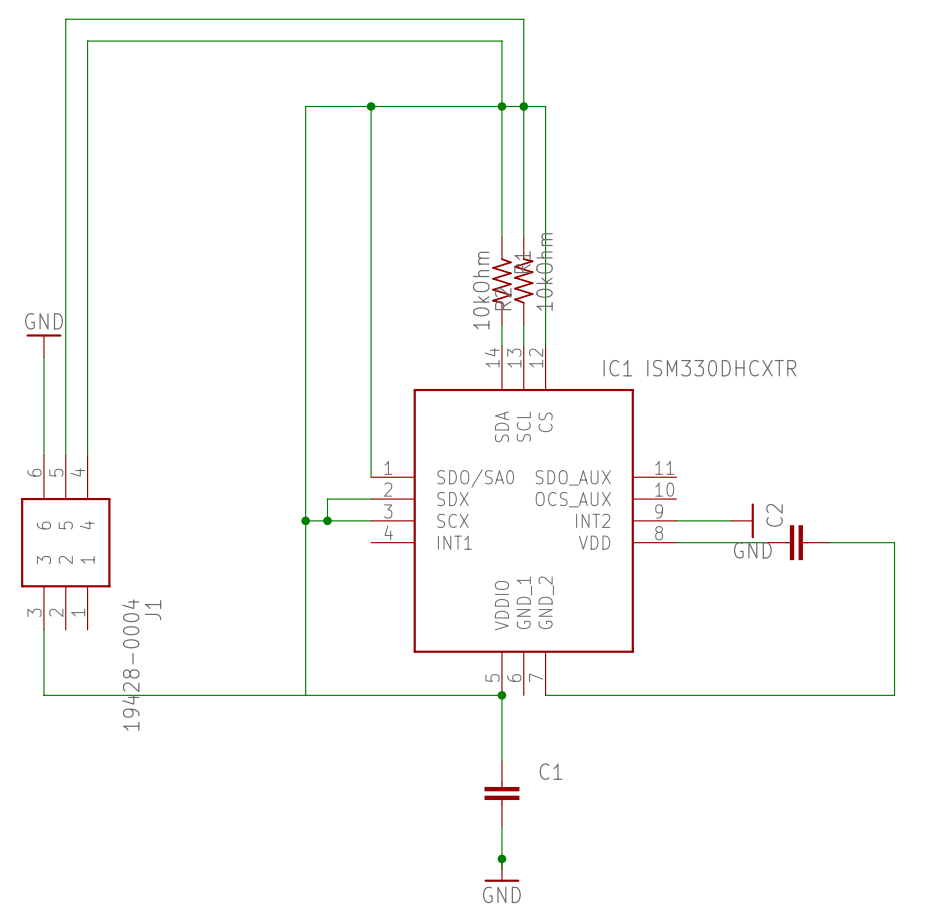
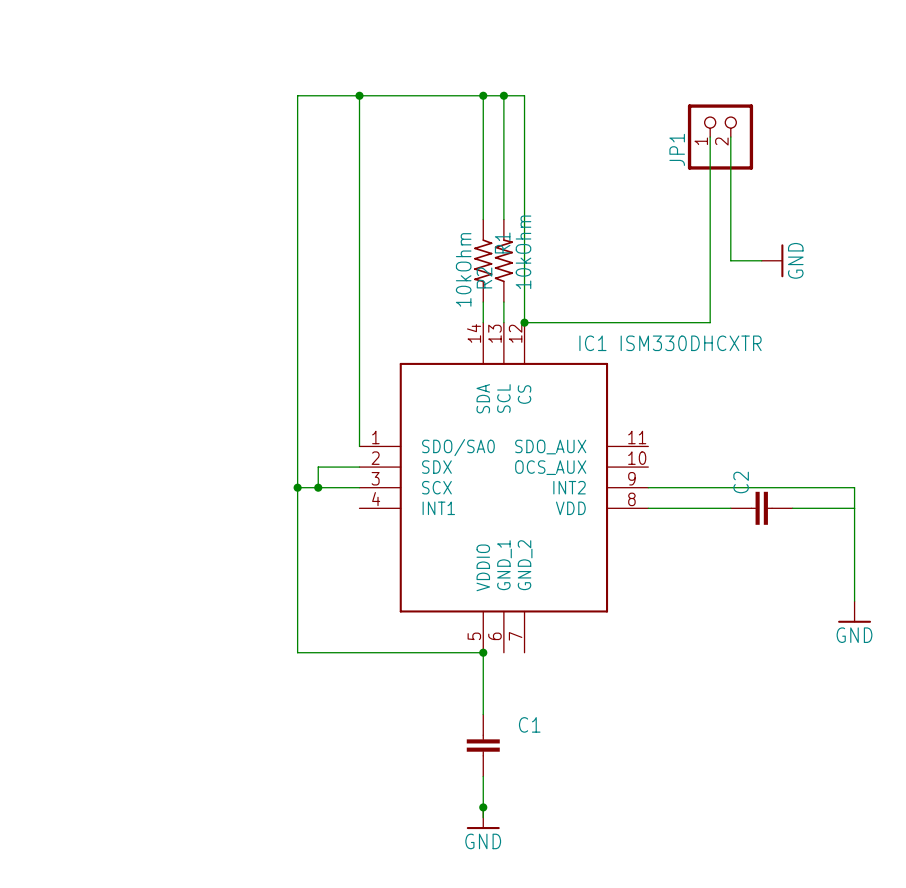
wire: (501, 106) (501, 41) (87, 41) (87, 455) -> none
wire: (523, 106) (523, 19) (65, 19) (65, 455) -> none
wire: none -> (710, 137) (710, 322) (524, 322)
JP1: none -> (720, 137)
wire: none -> (730, 137) (730, 260) (761, 260)
power symbol: none -> GND (772, 260)
power symbol: GND (43, 345) -> none
junction: none -> (524, 322)
wire: (43, 357) (43, 455) -> none
wire: none -> (699, 487) (854, 487) (854, 508)
power symbol: GND (742, 520) -> none
J1: 19428-0004 (65, 542) -> none
wire: (43, 629) (43, 695) (305, 695) -> none
wire: (894, 640) (894, 695) (545, 695) -> none
power symbol: none -> GND (854, 611)

